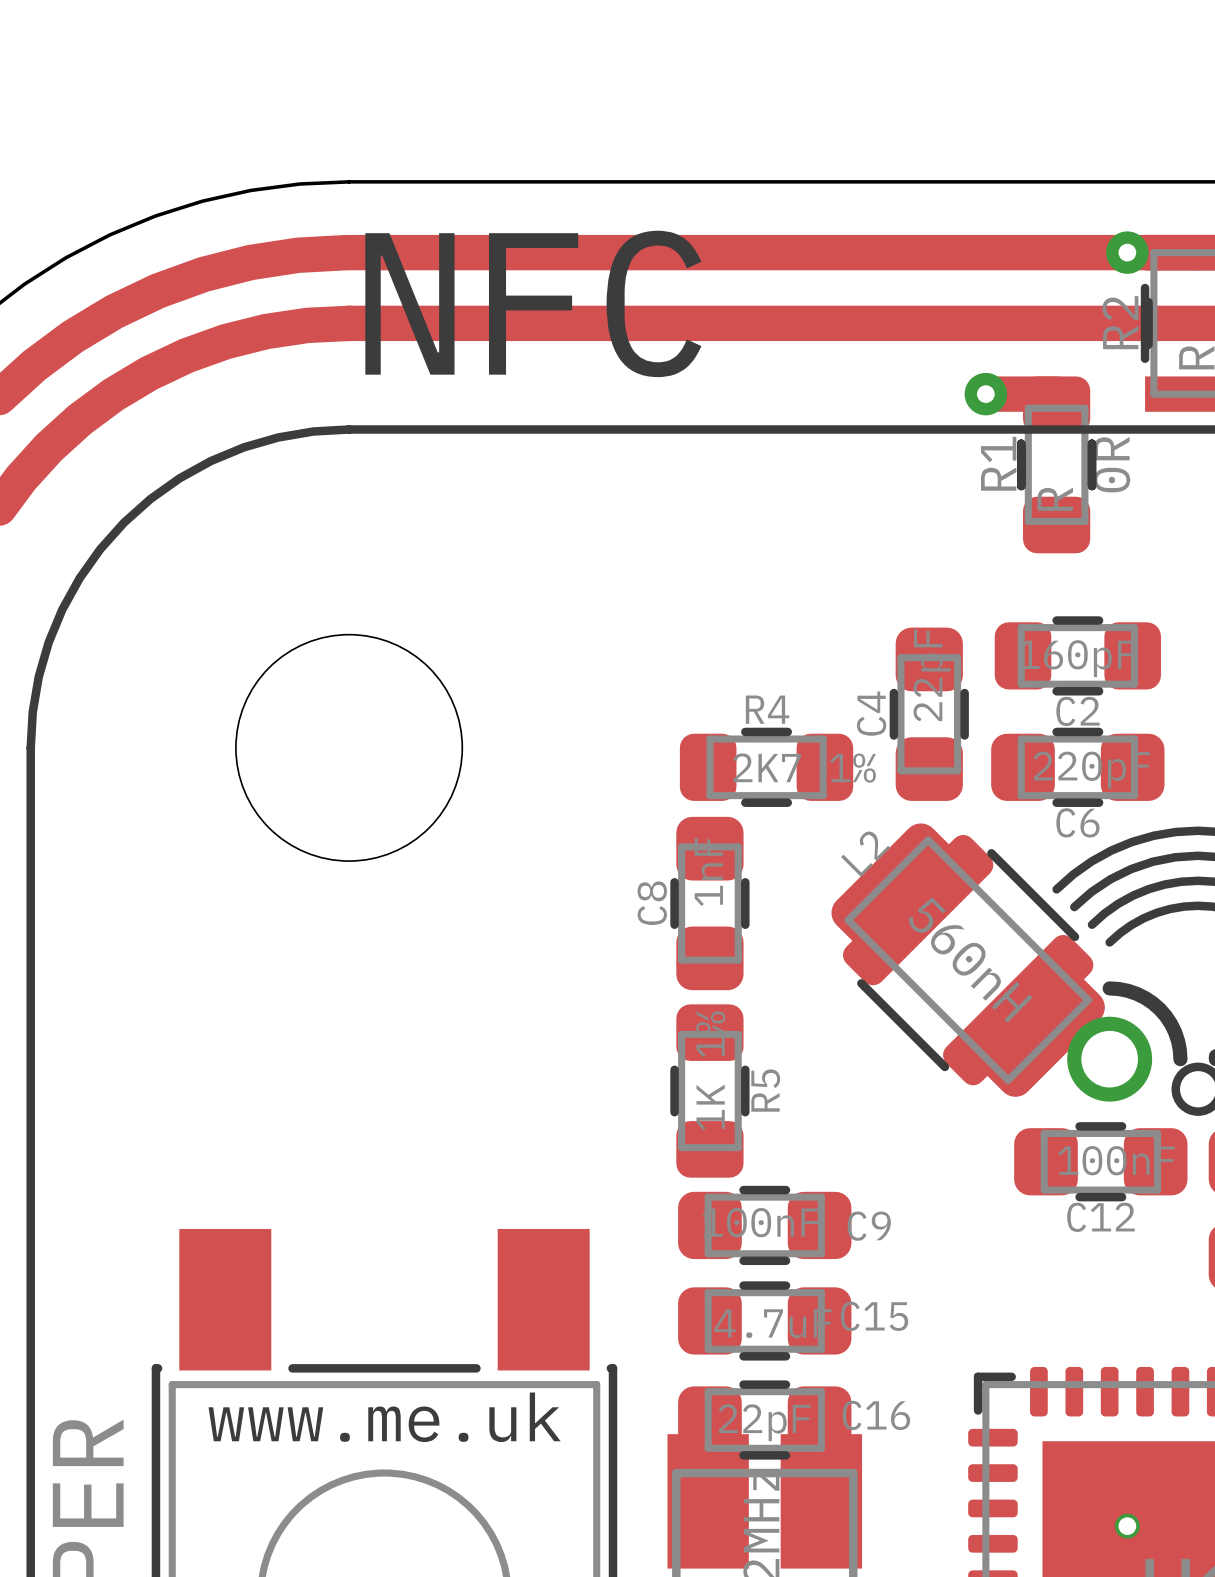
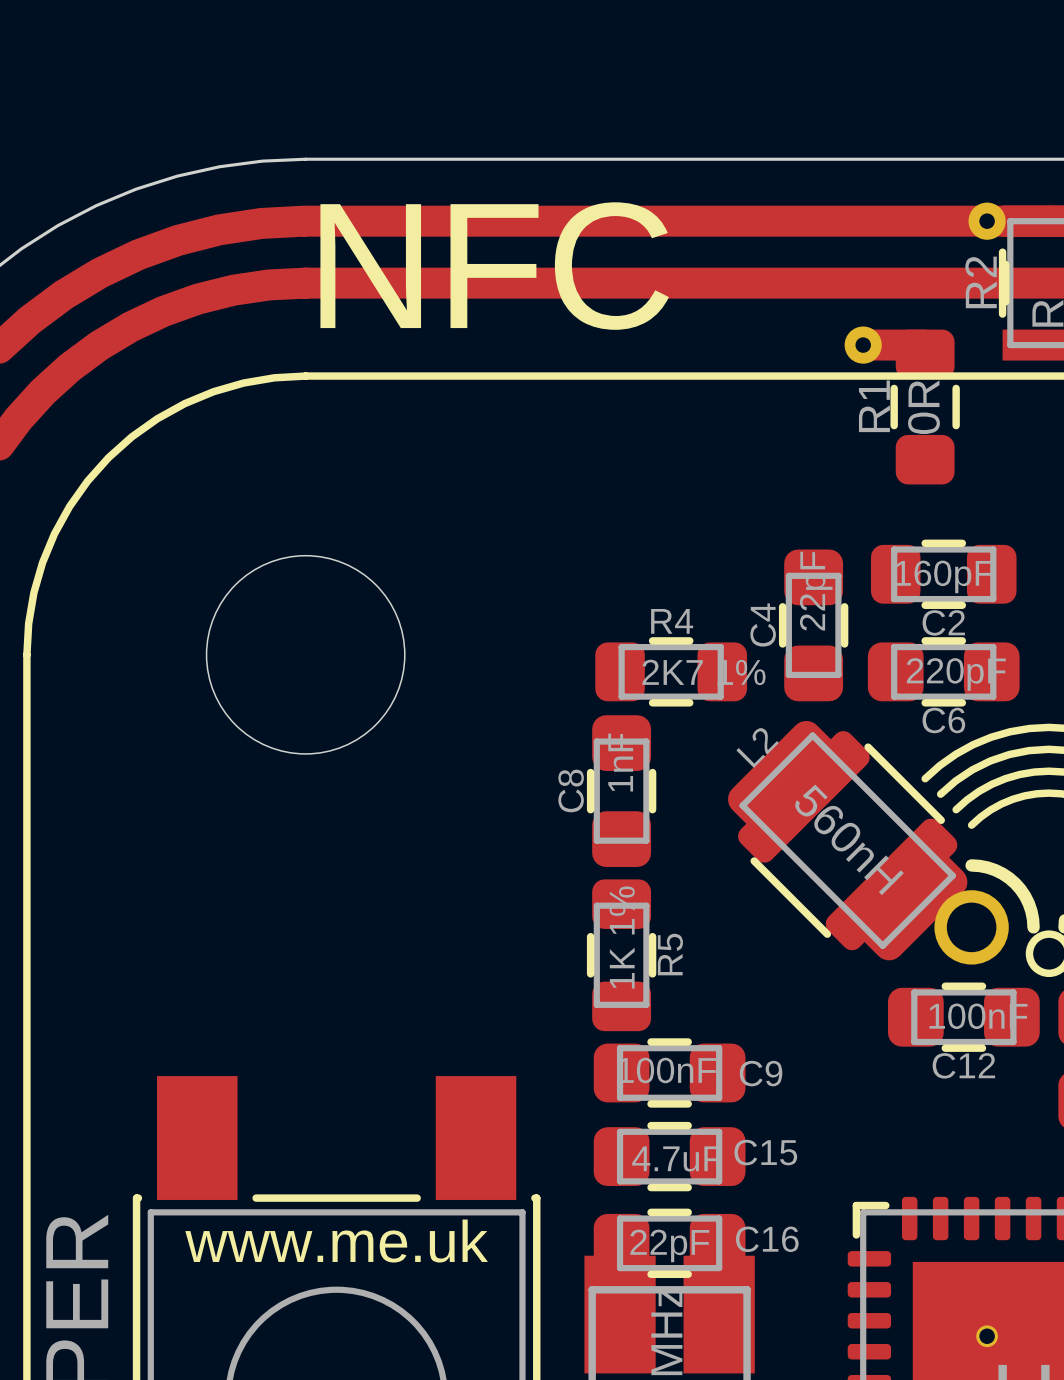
R1 footprint: [1016, 404, 1097, 526] -> [858, 380, 940, 435]

